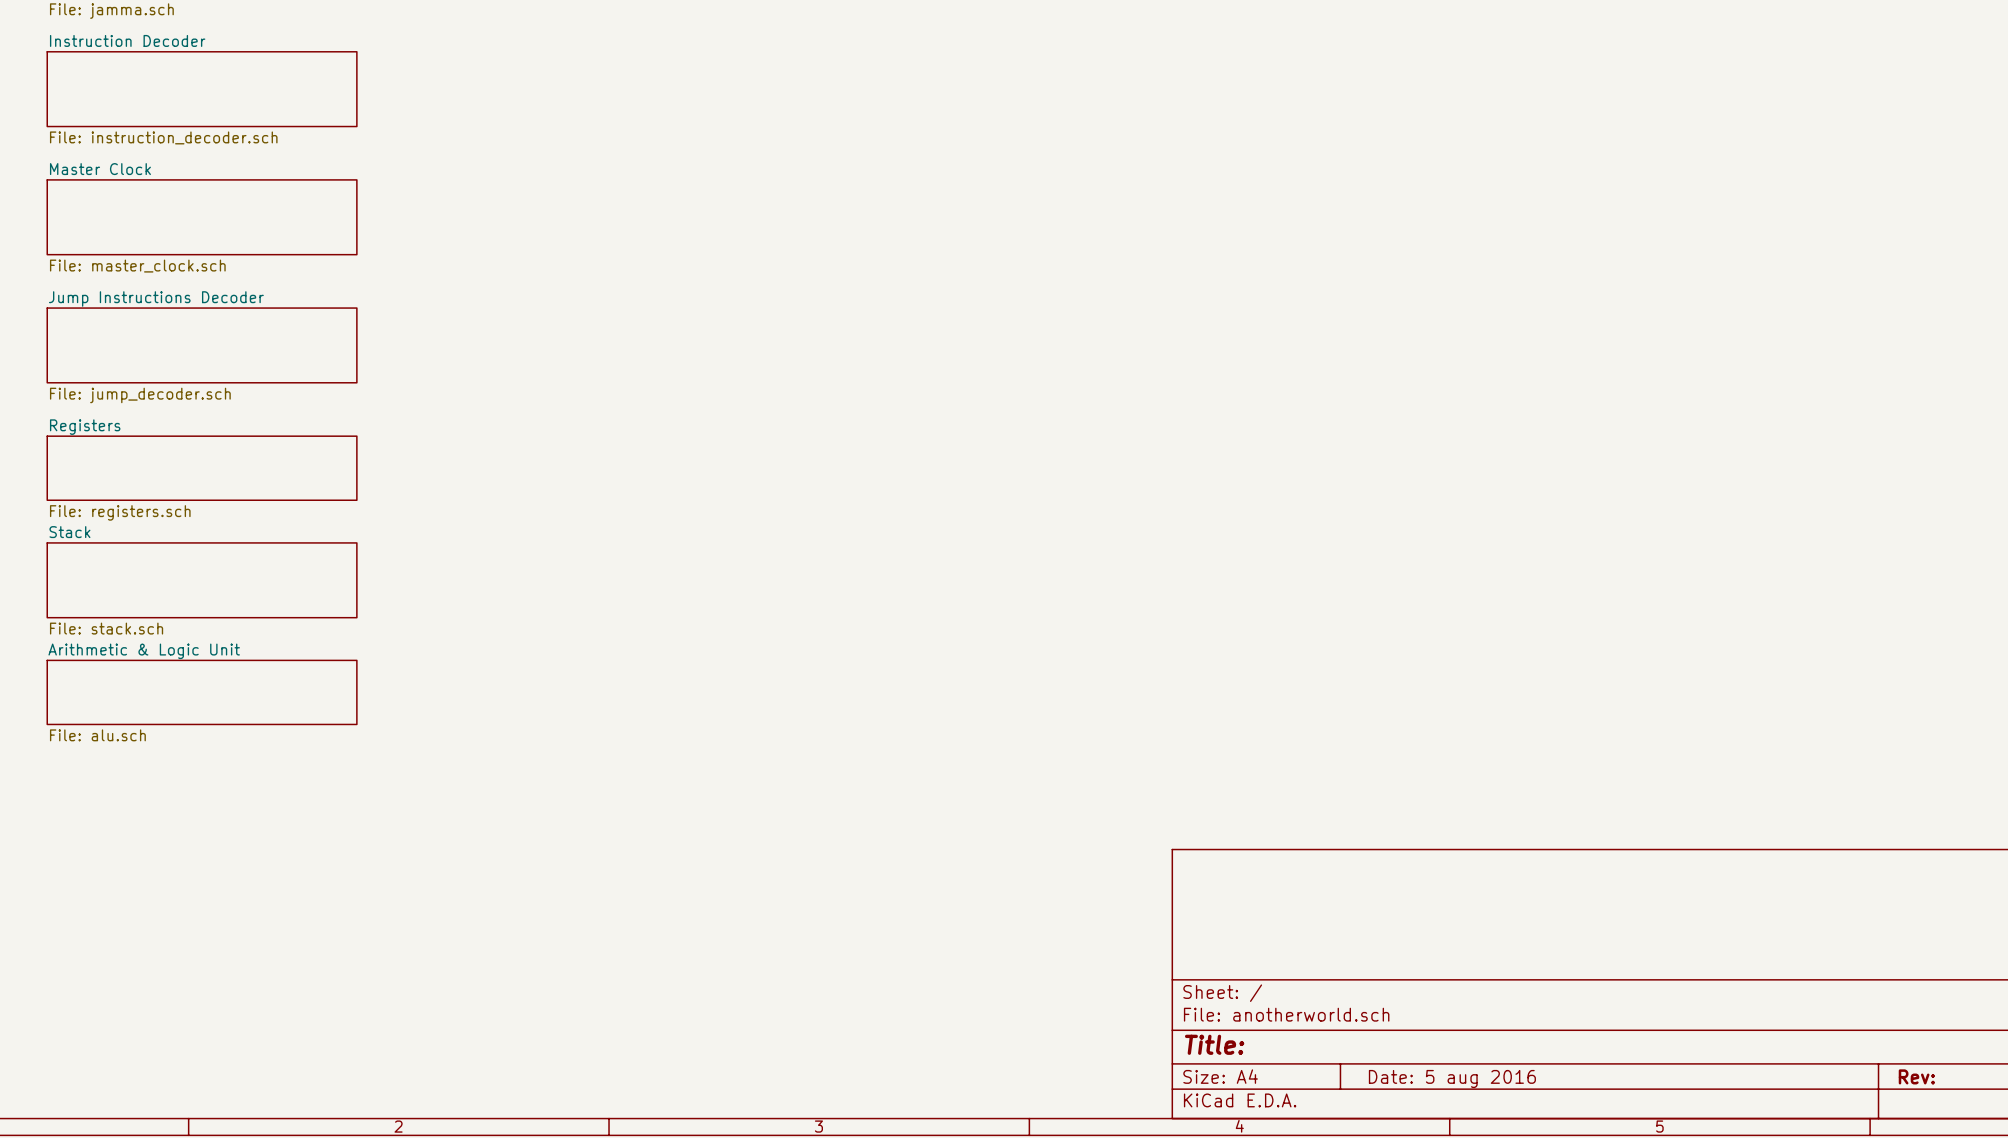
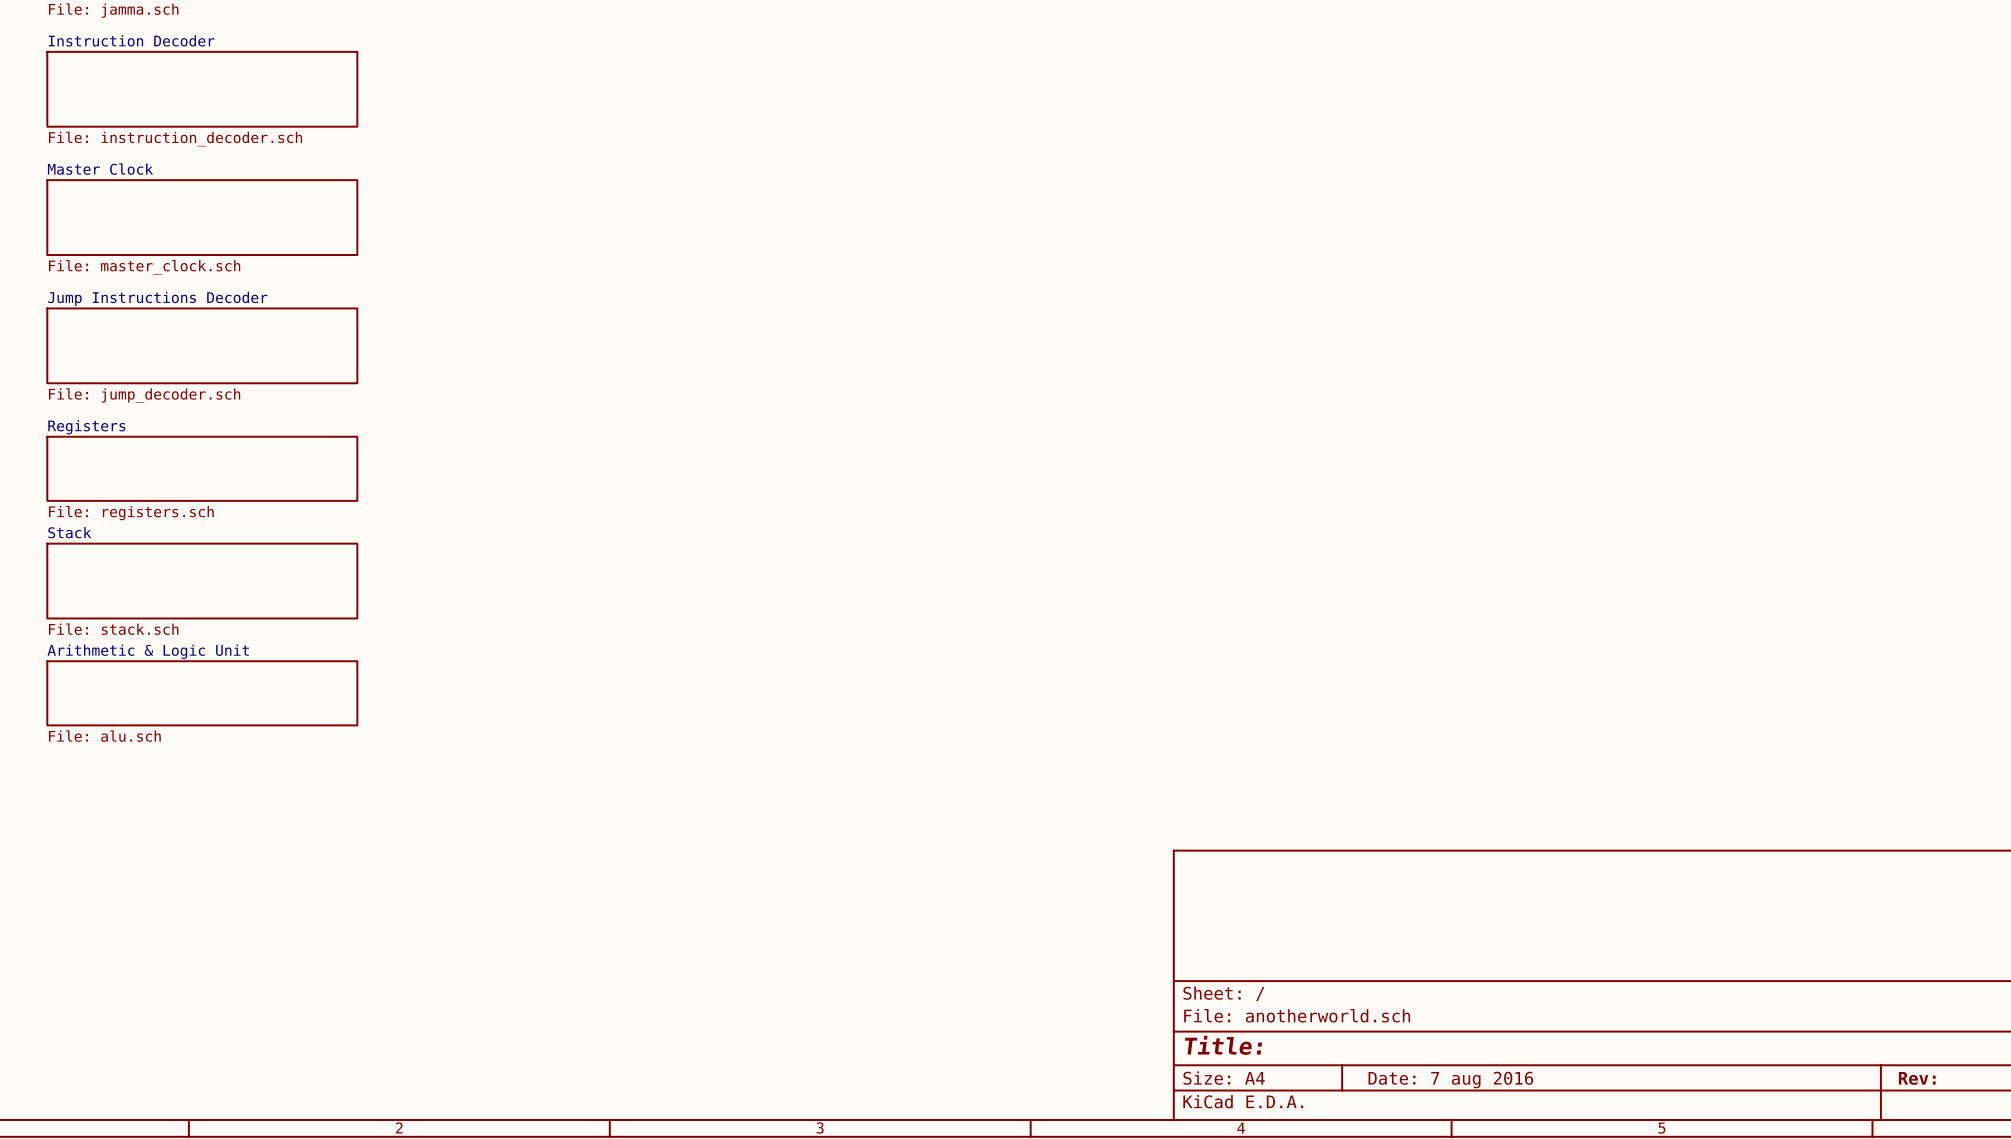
title block: Date: 5 aug 2016 (1452, 1079) -> Date: 7 aug 2016 (1450, 1080)

